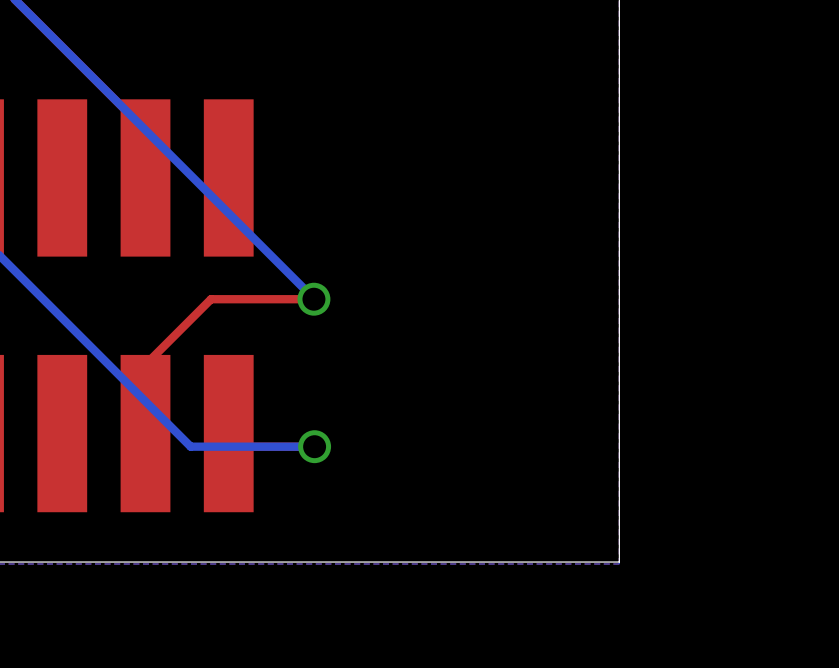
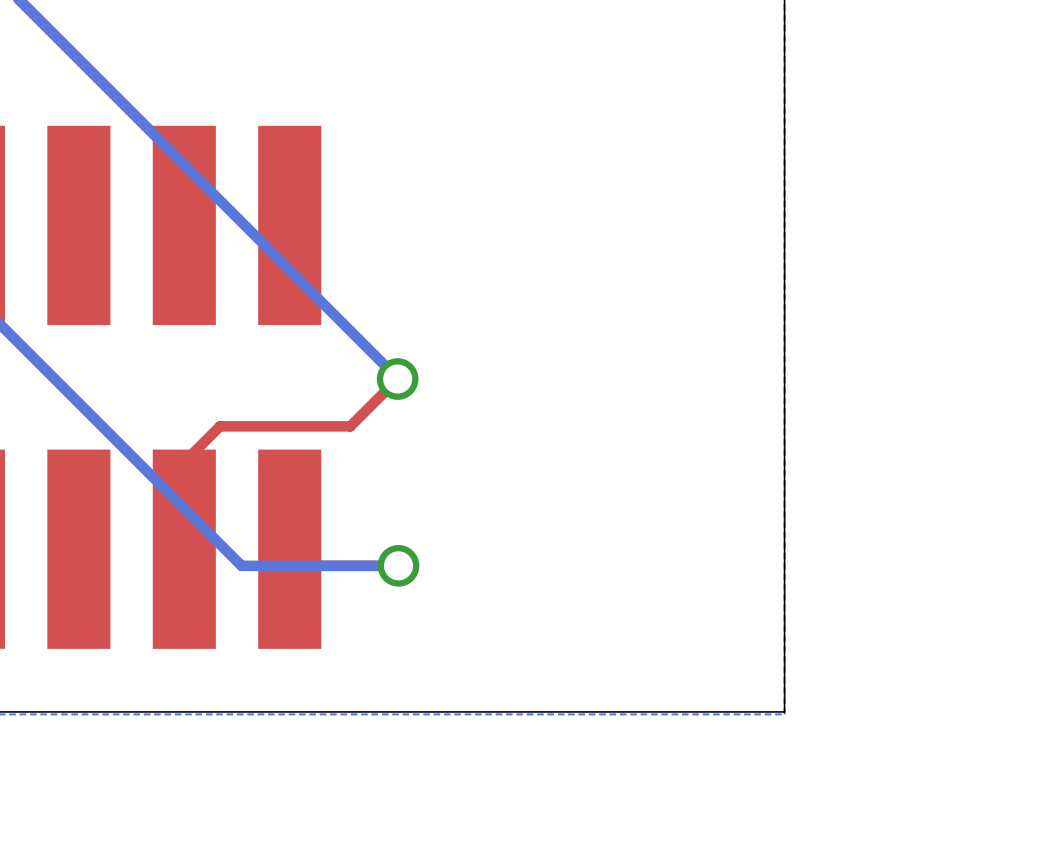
top track: (313, 299) (211, 299) (173, 336) -> (397, 379) (350, 426) (220, 426)

